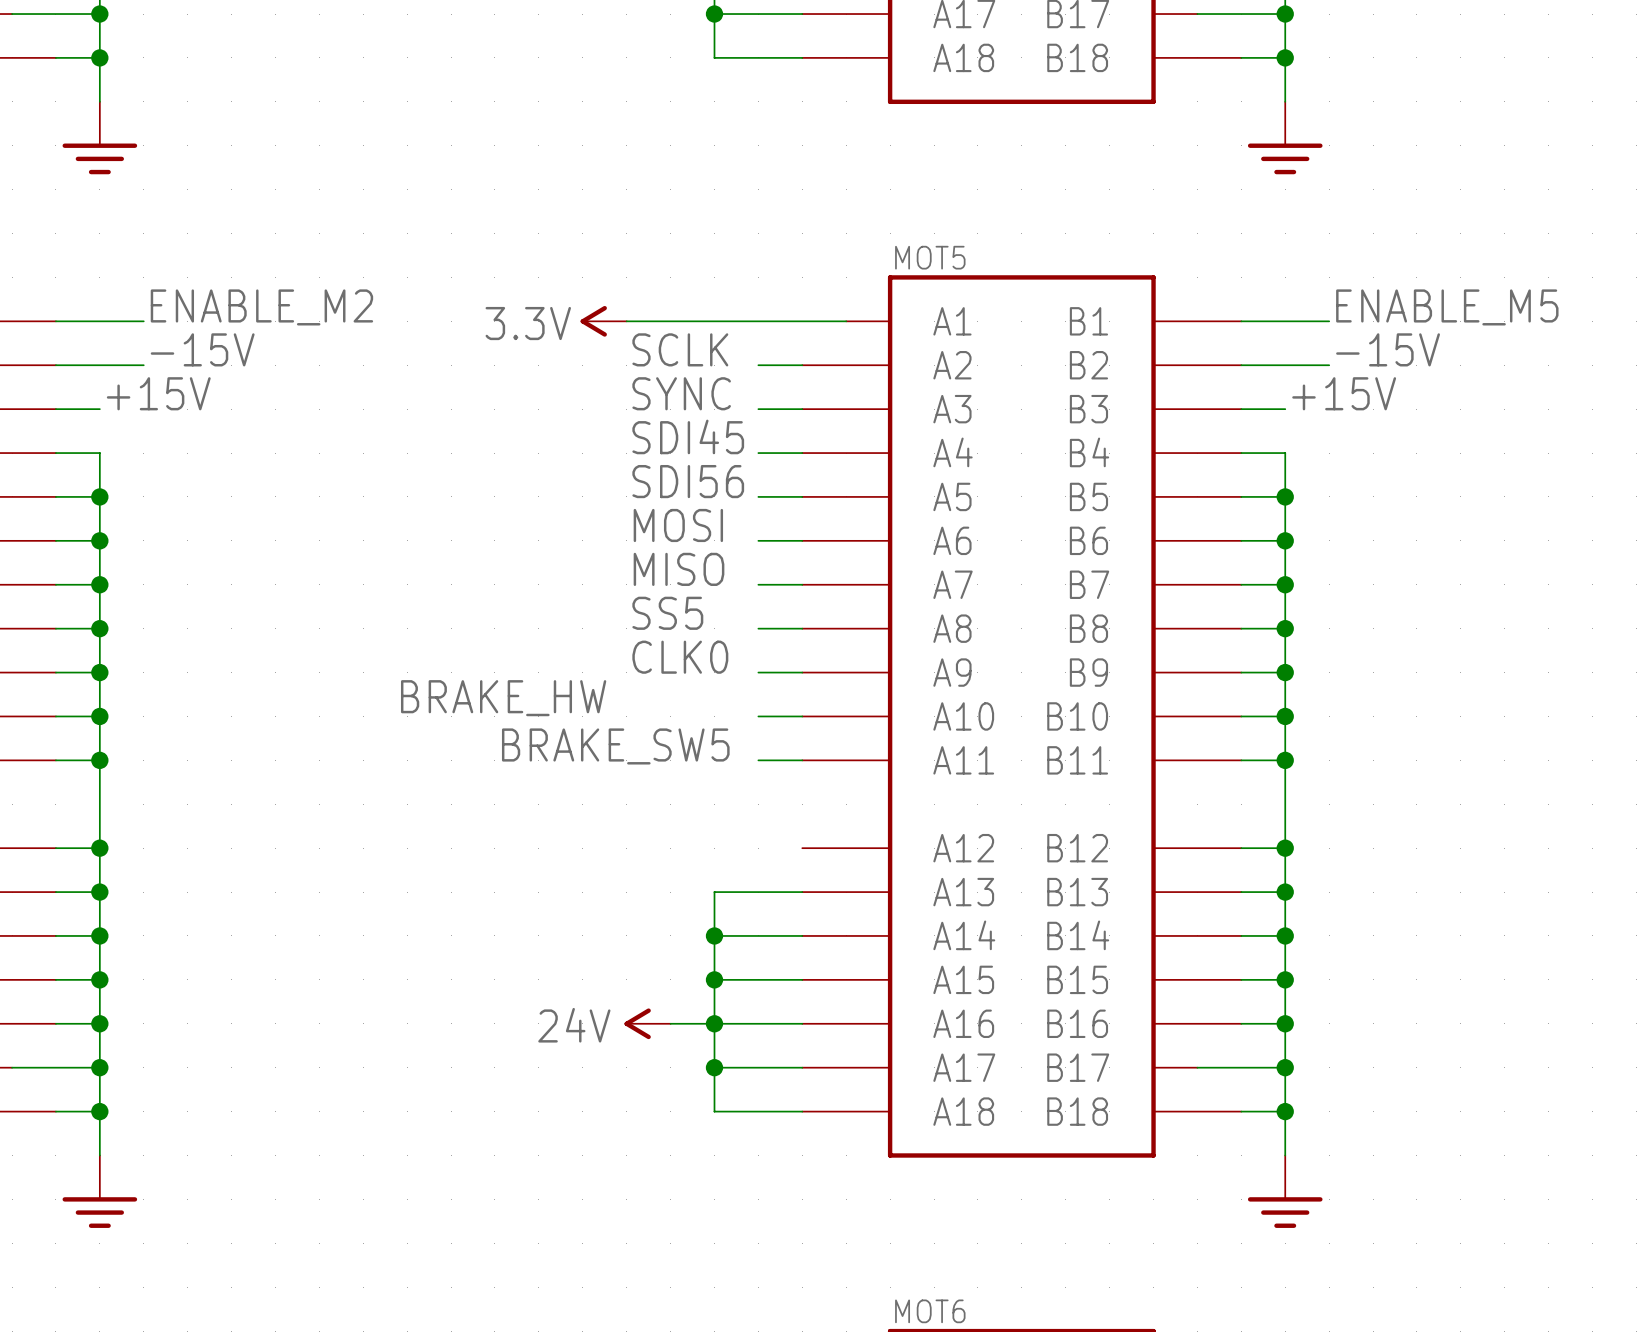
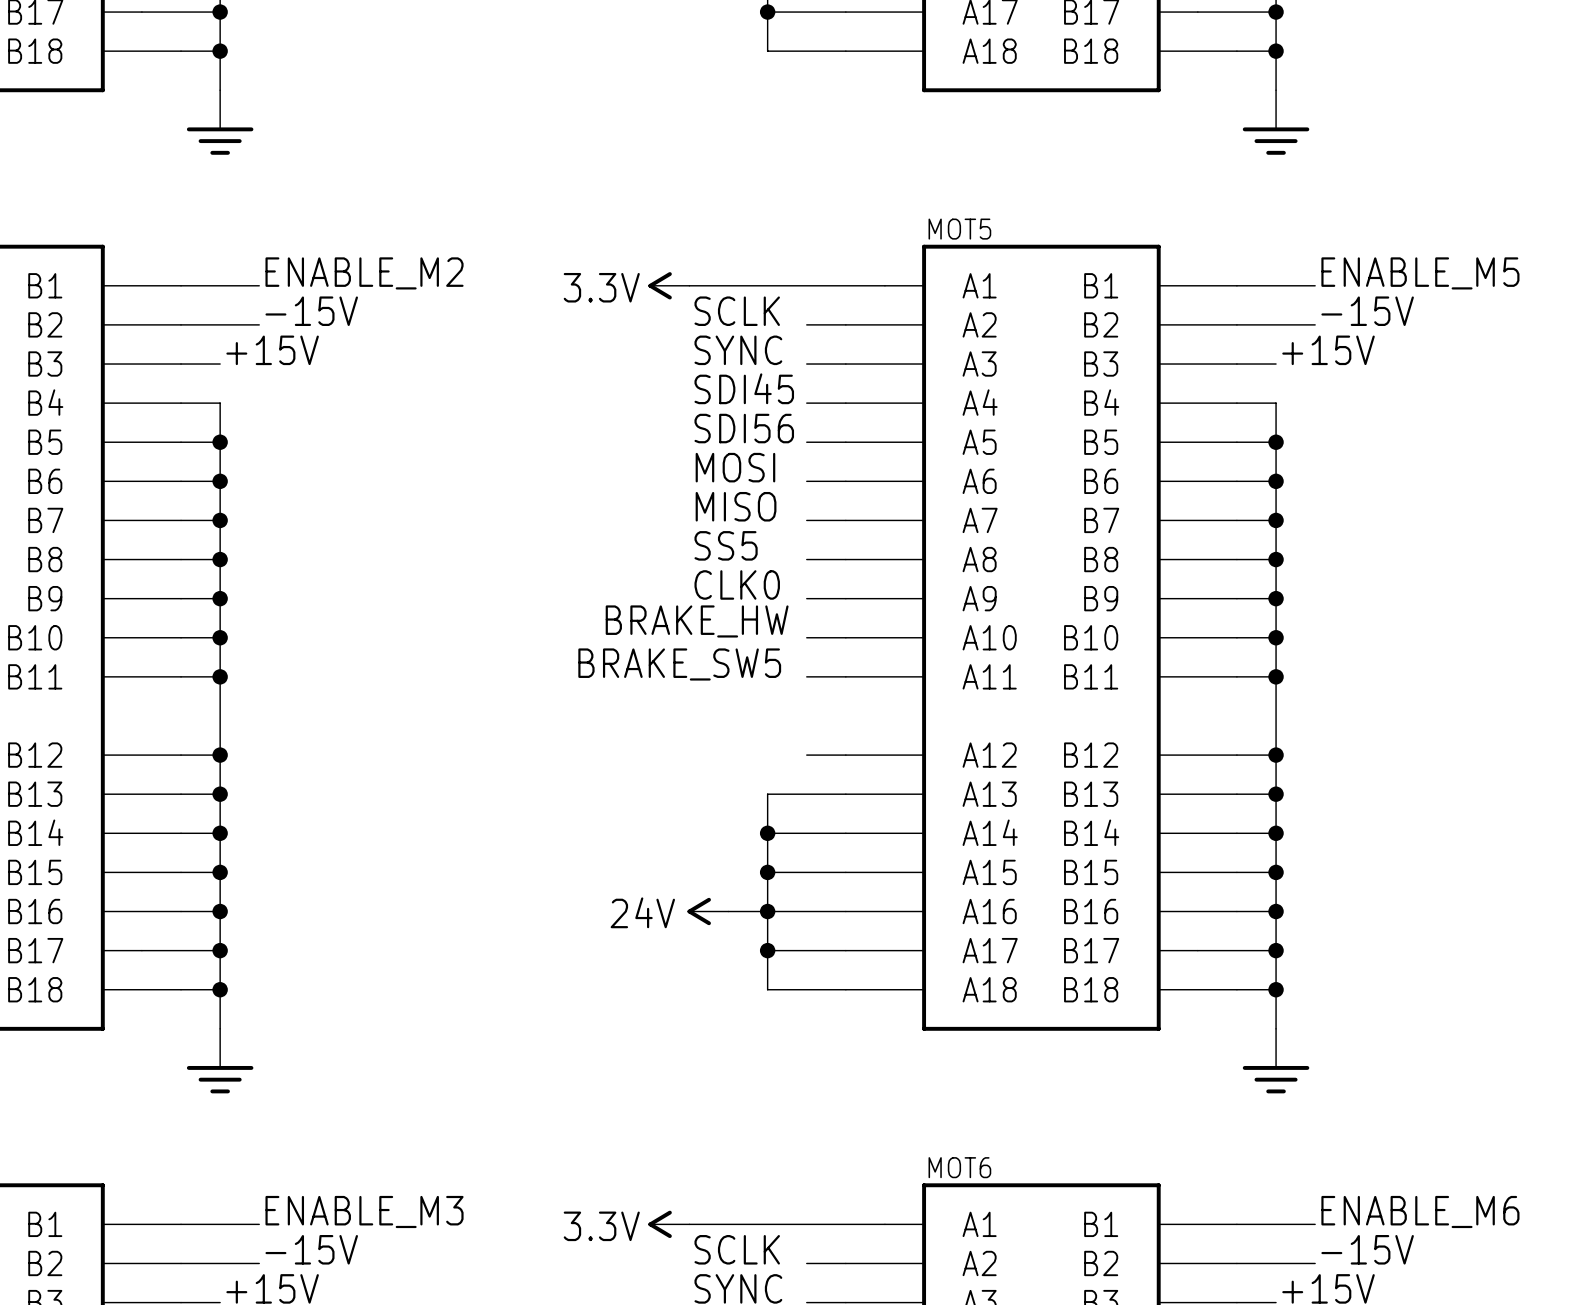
label position: BRAKE_HW (503, 698) -> BRAKE_HW (697, 621)
wire: none -> (806, 755) (845, 755)

